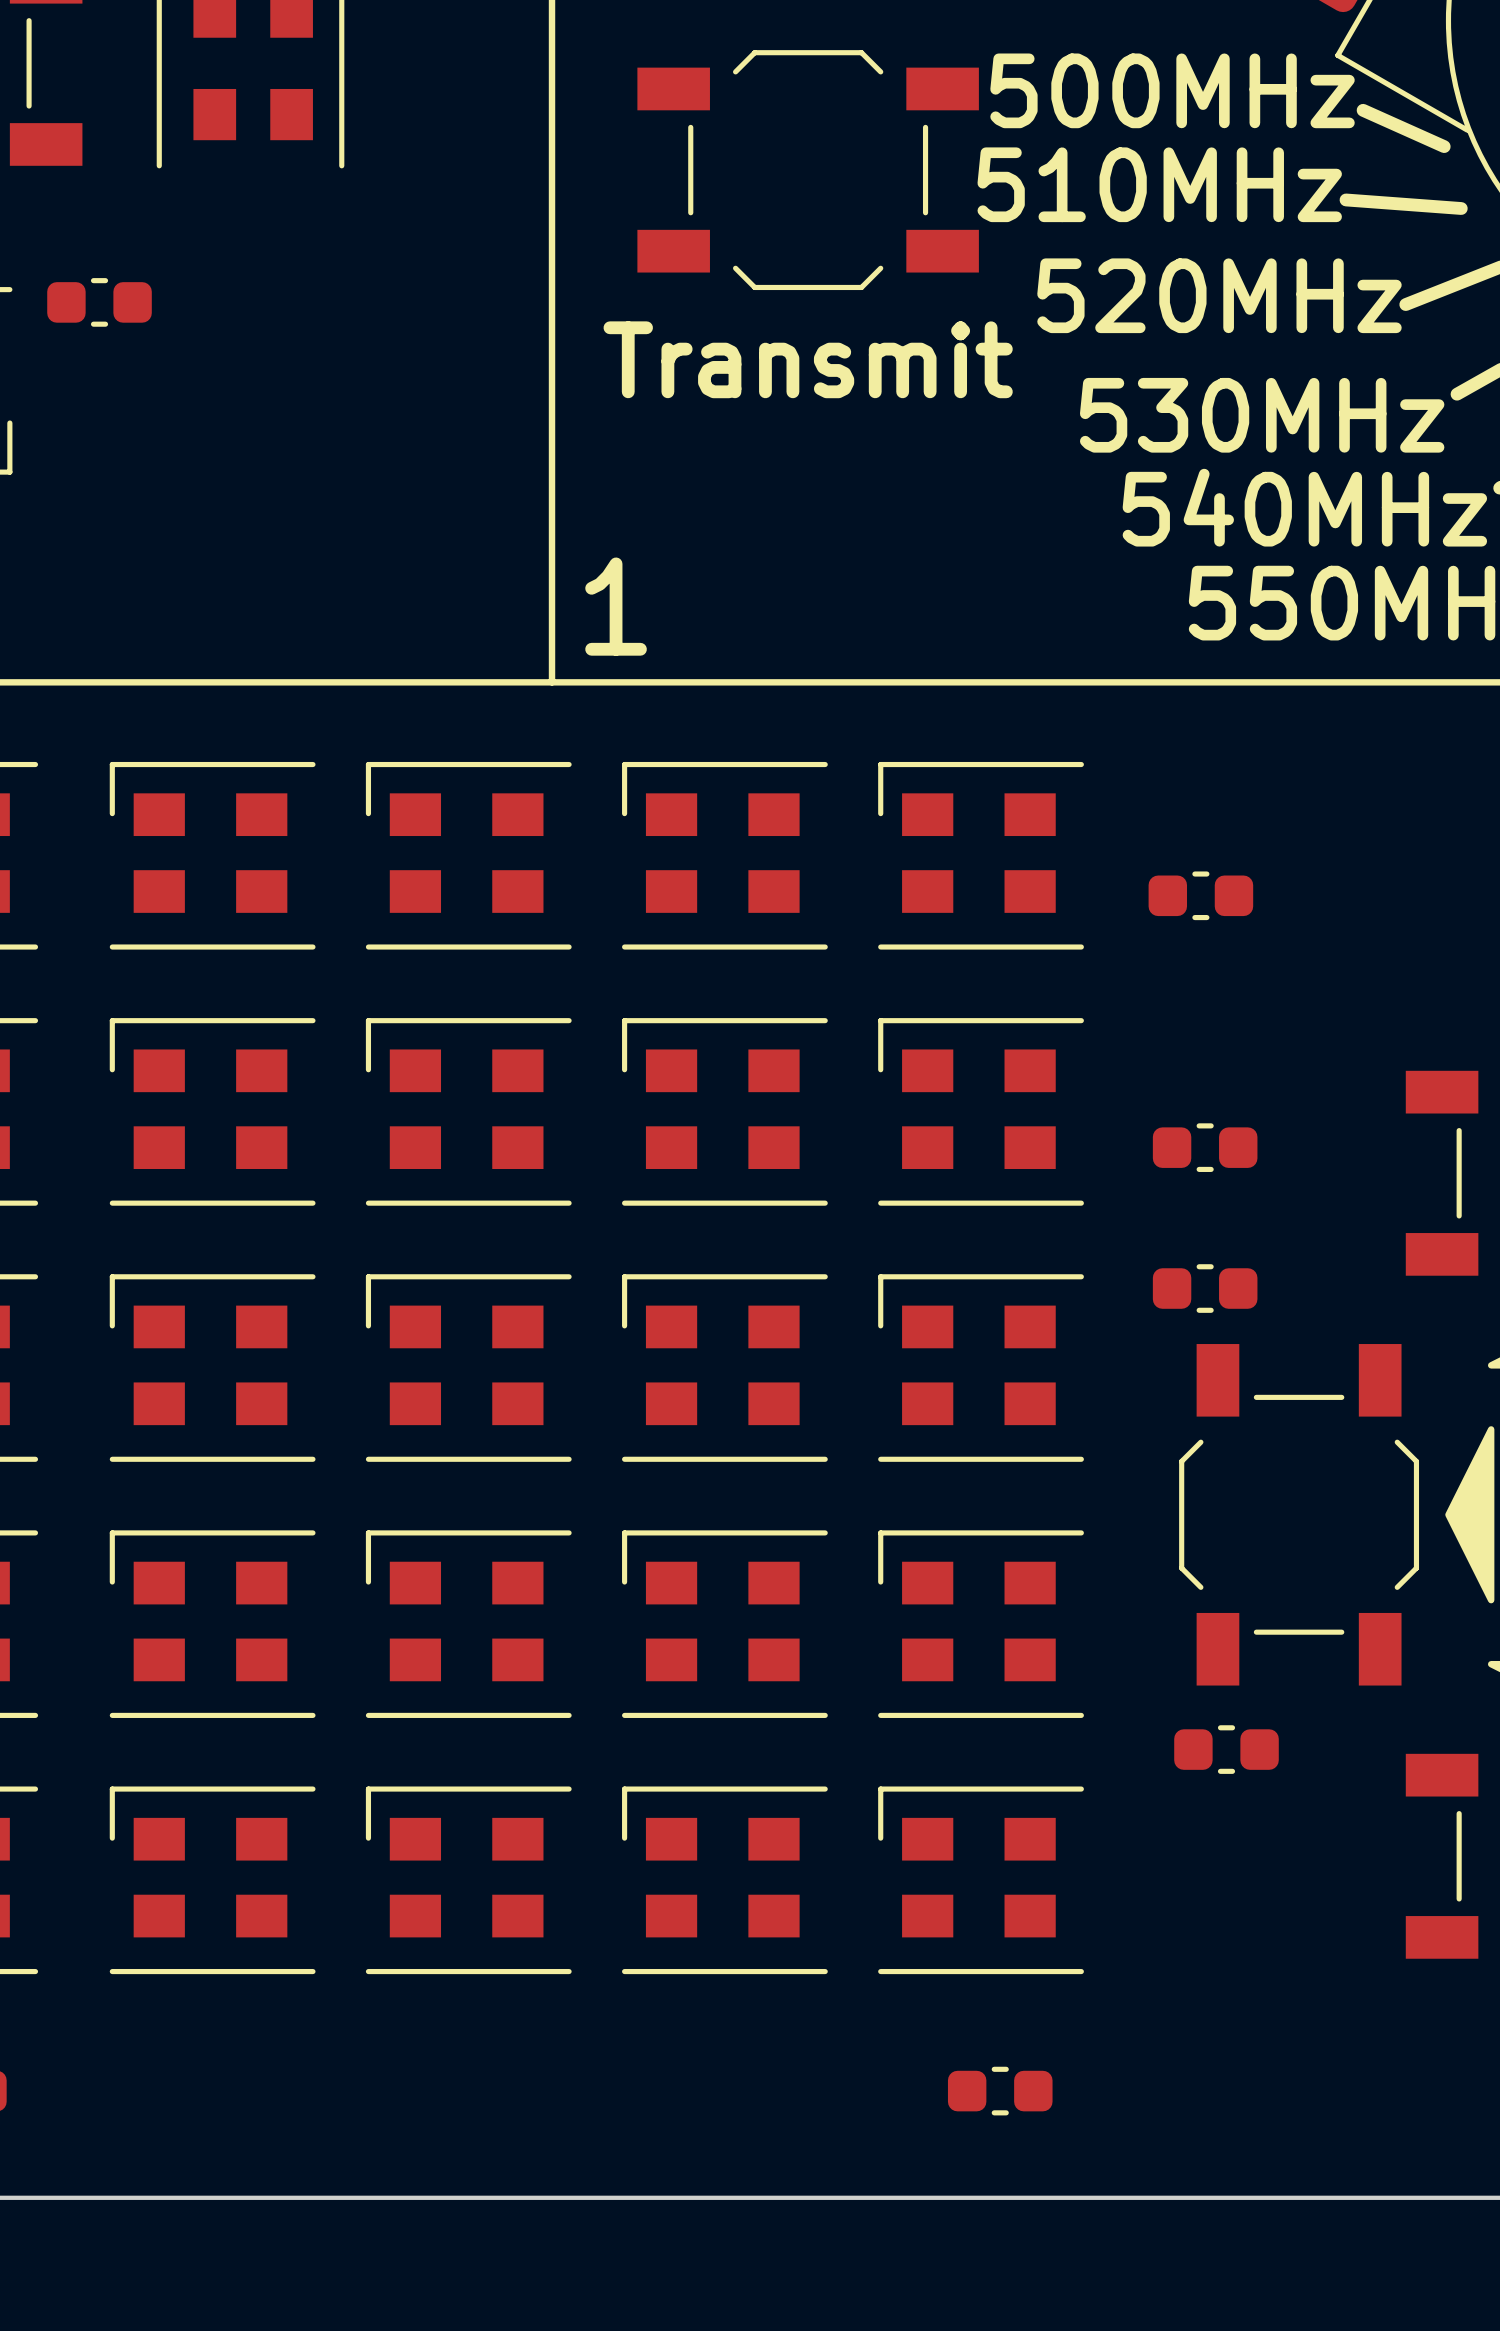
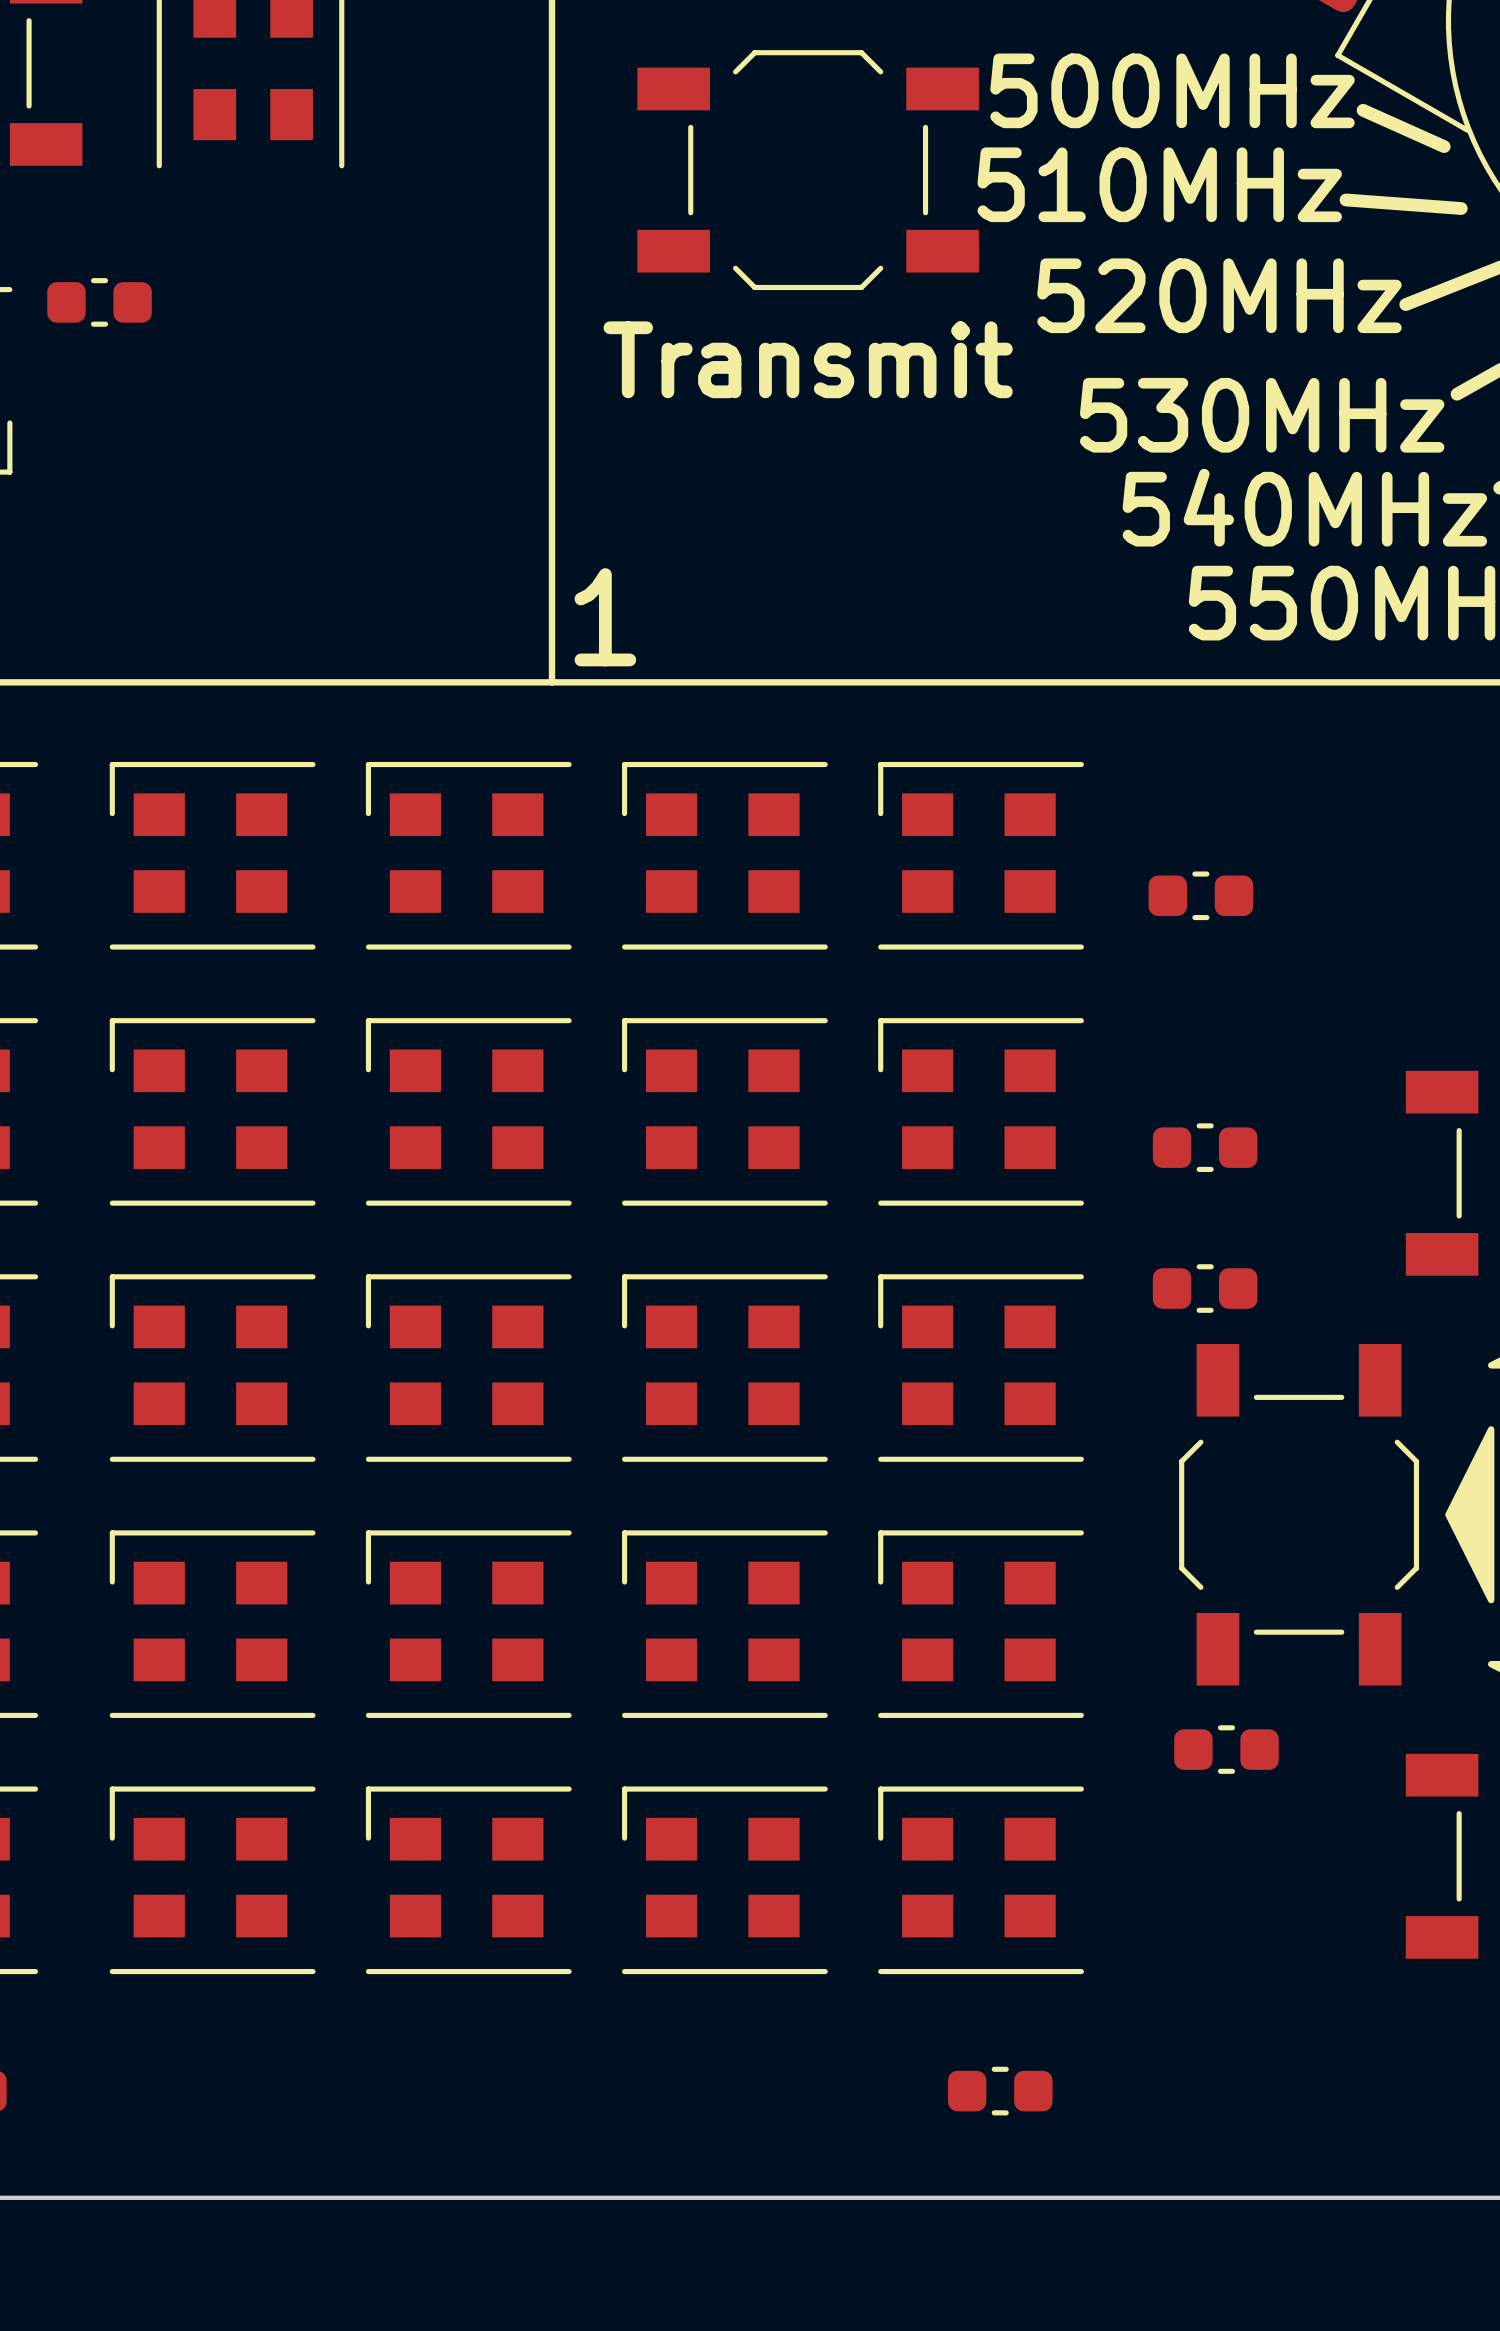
text position: 1 (616, 606) -> 1 (605, 617)

